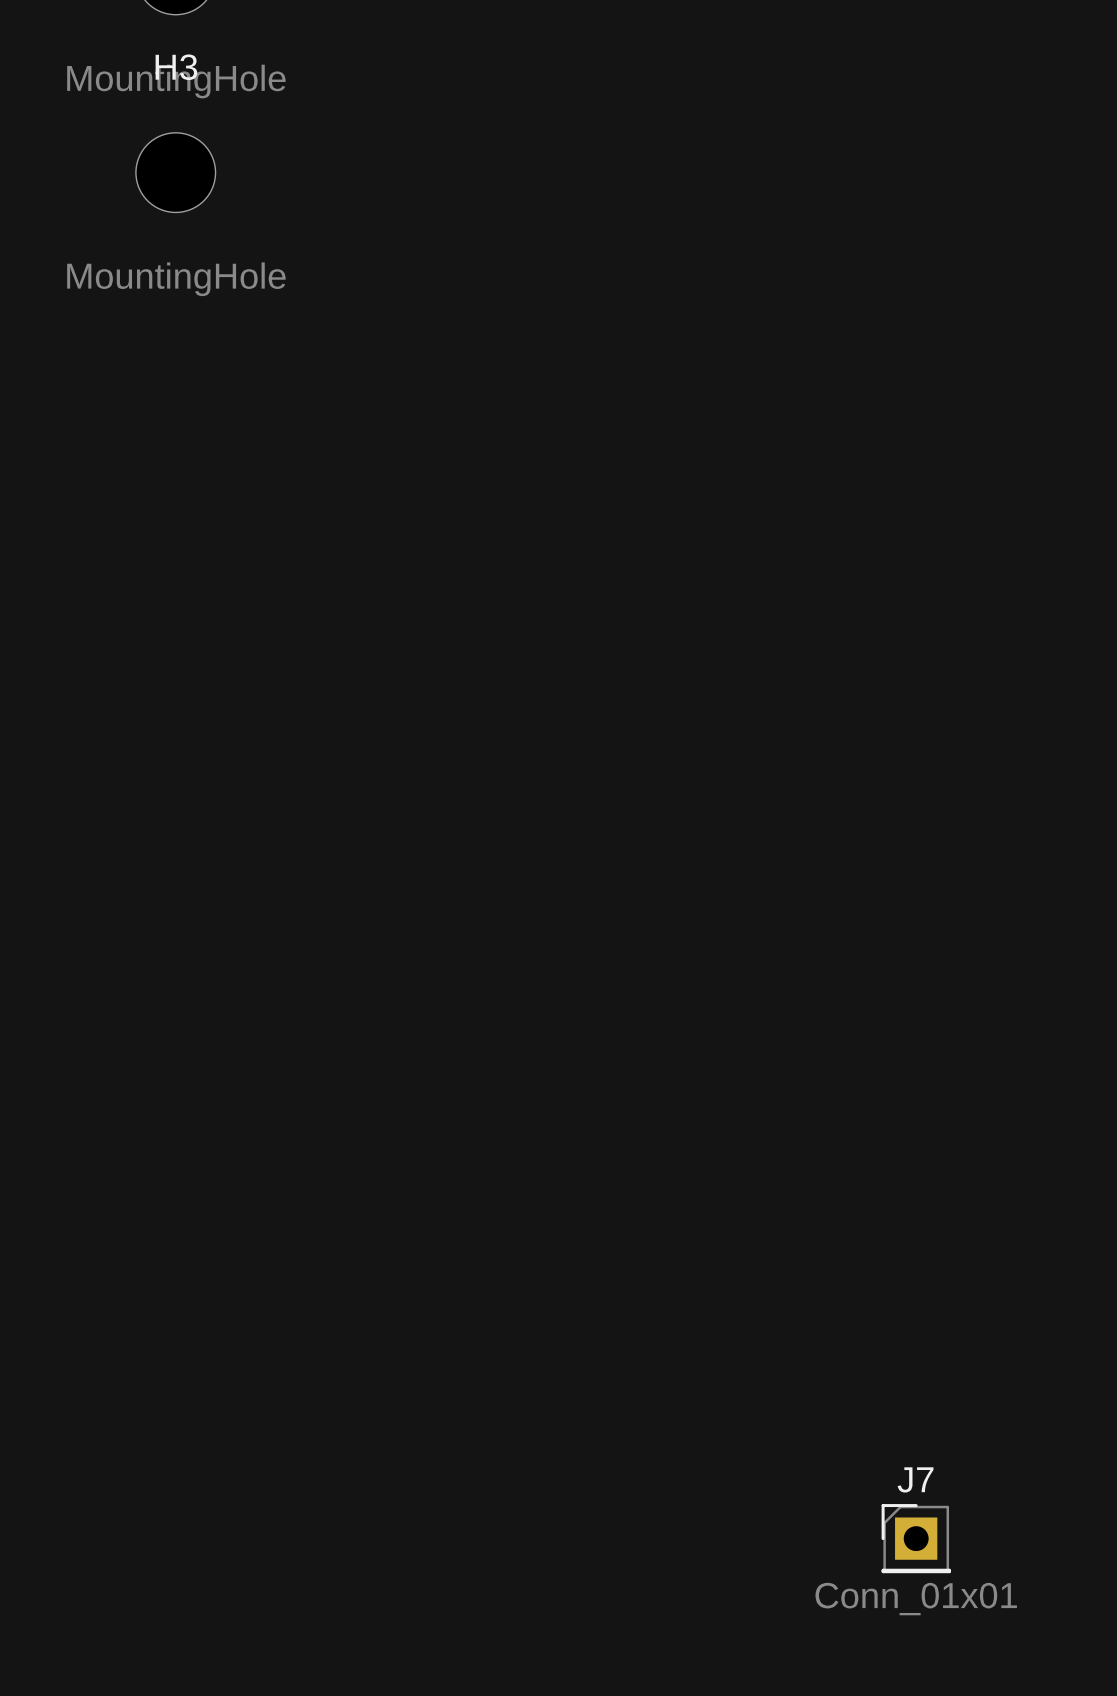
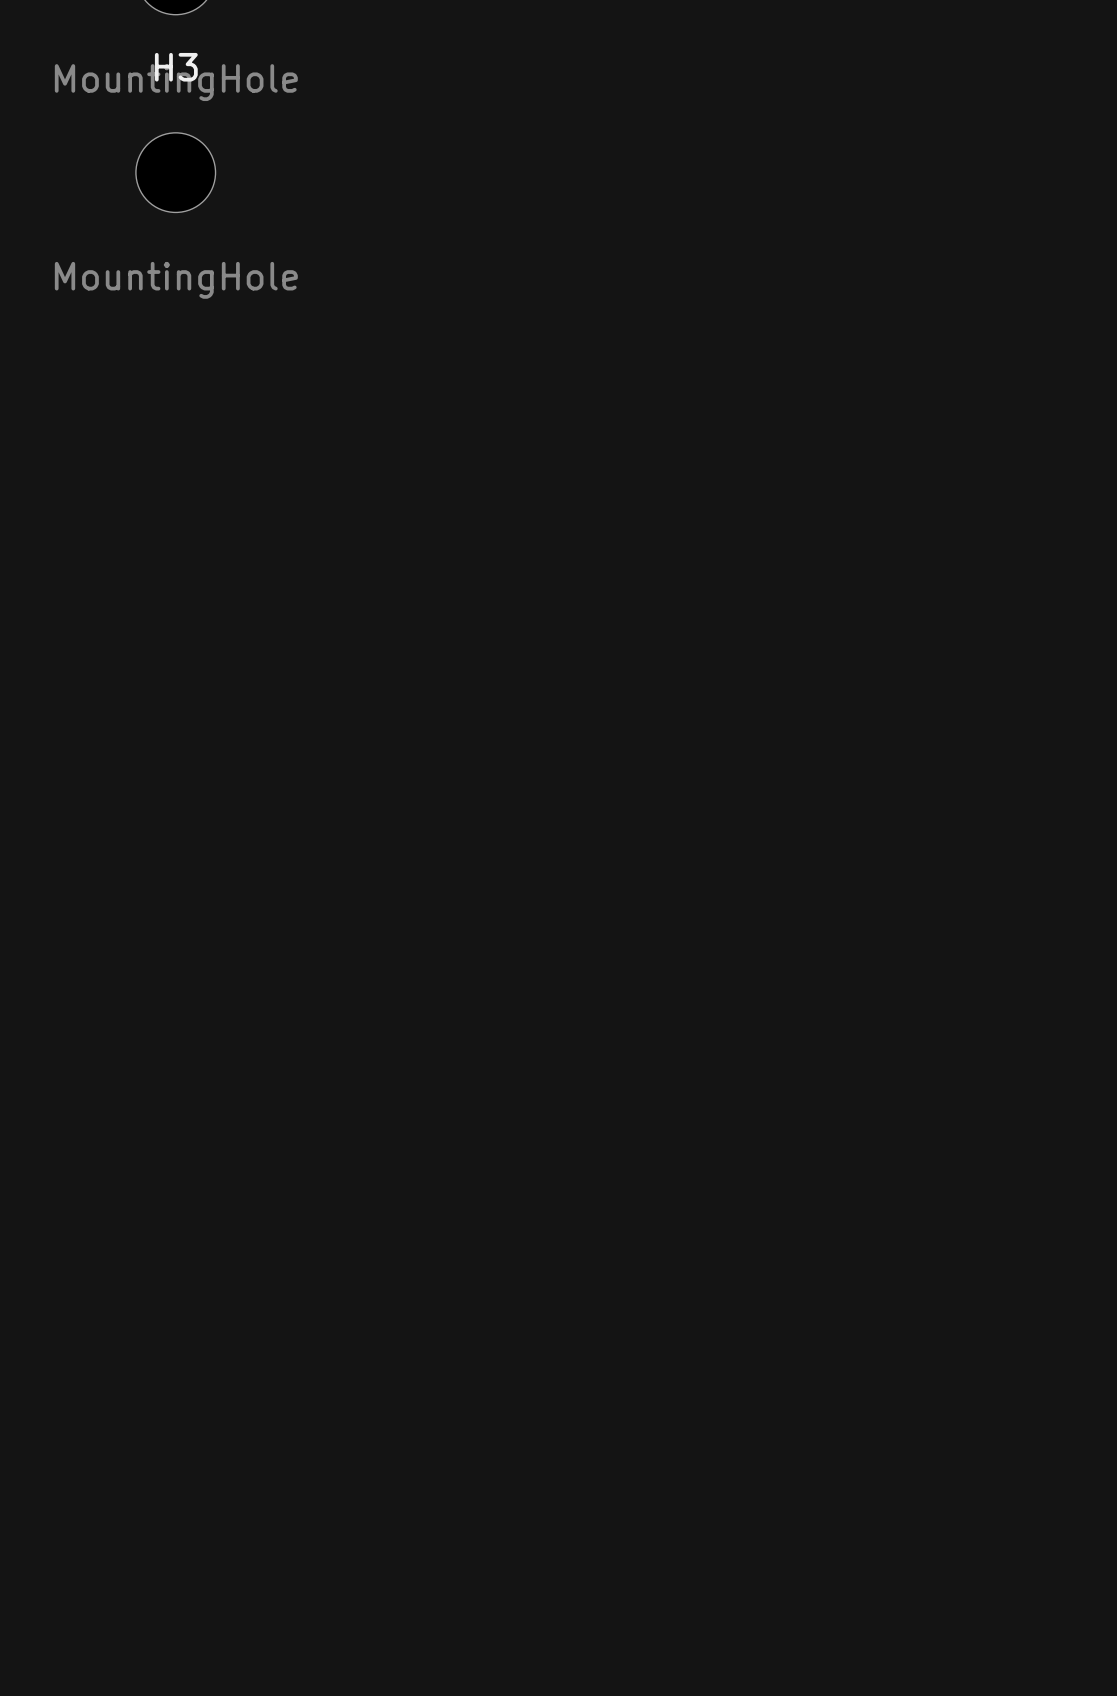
J7: Conn_01x01 (916, 1538) -> none

